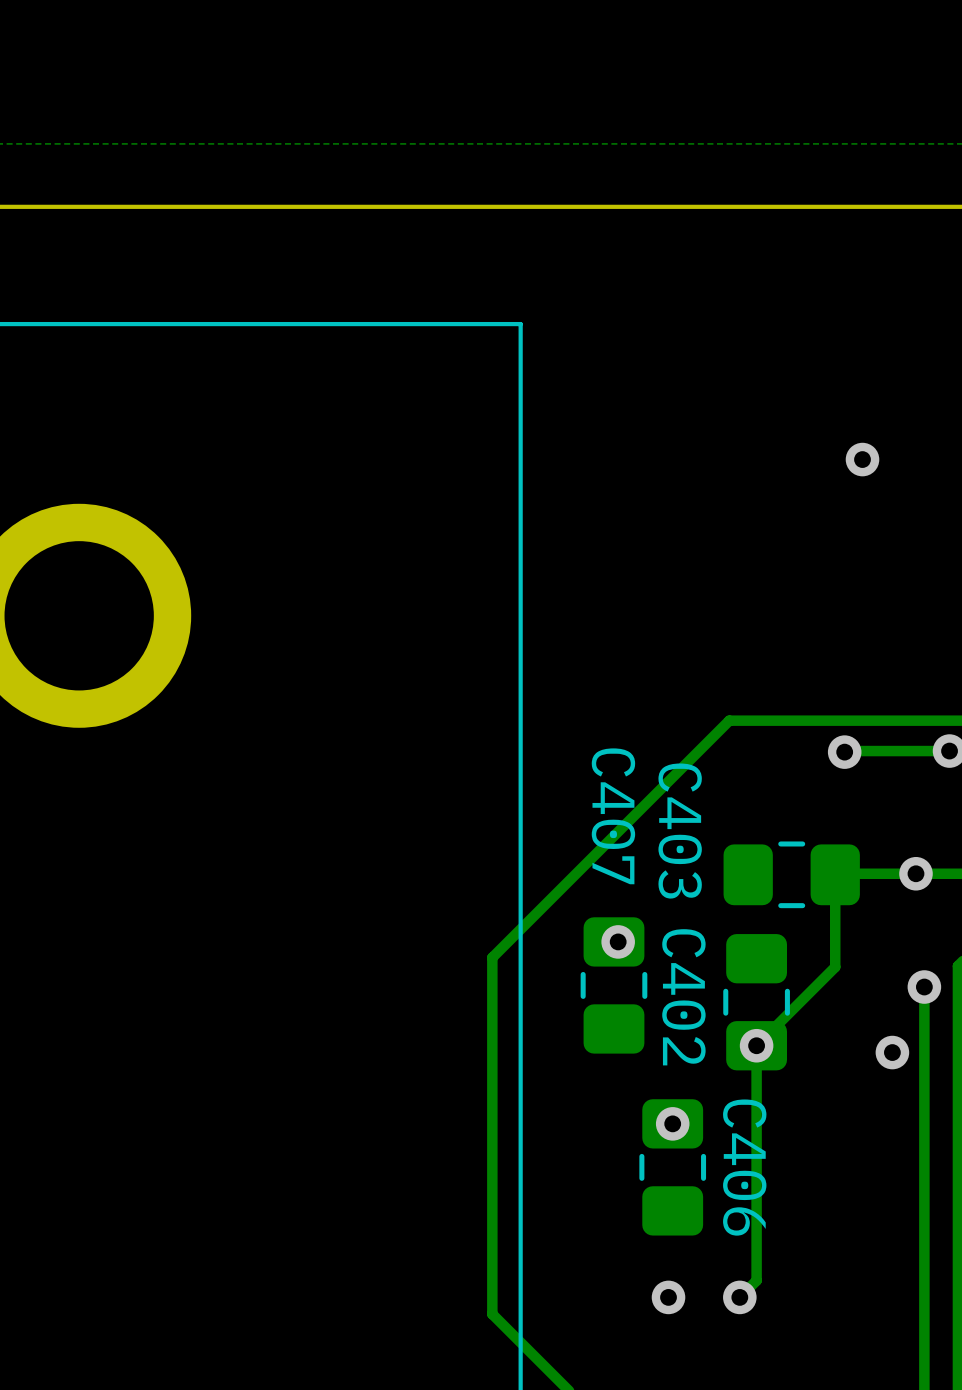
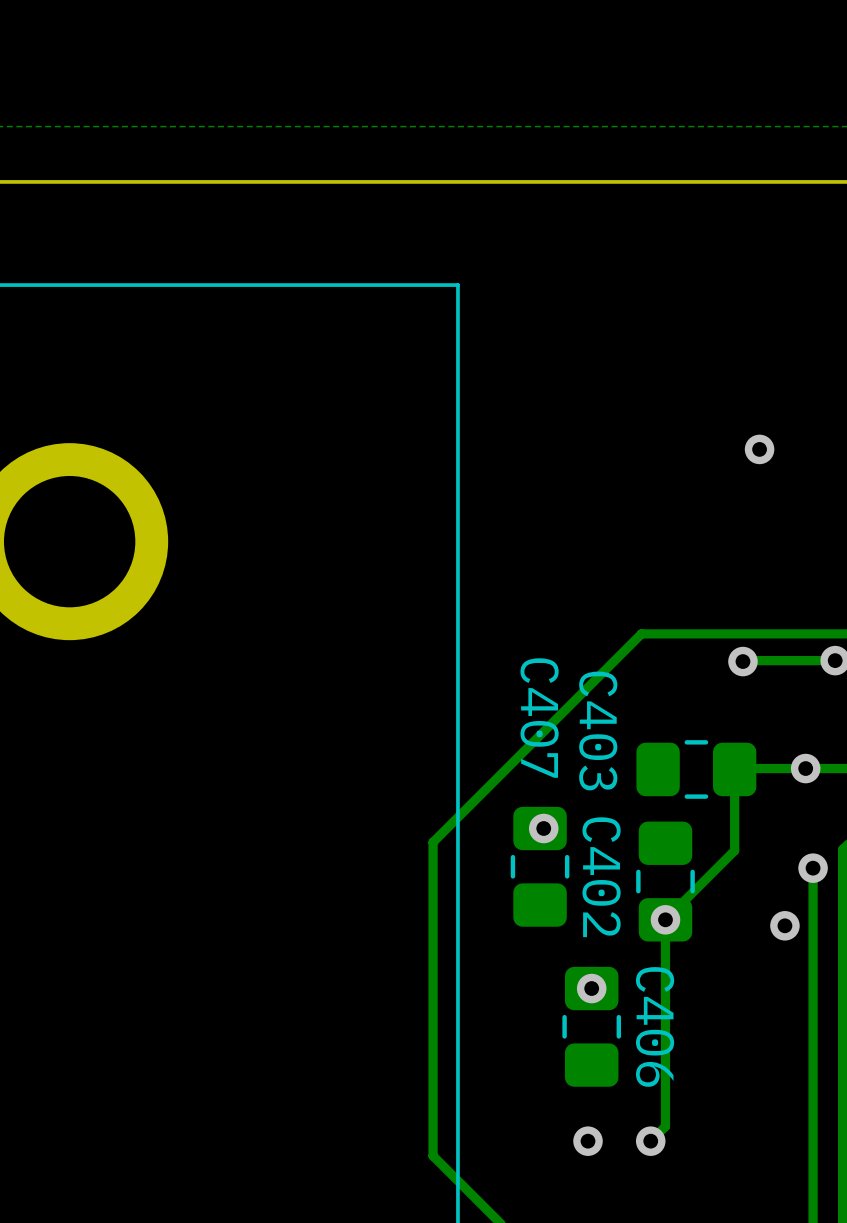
via position: (862, 459) -> (759, 449)

